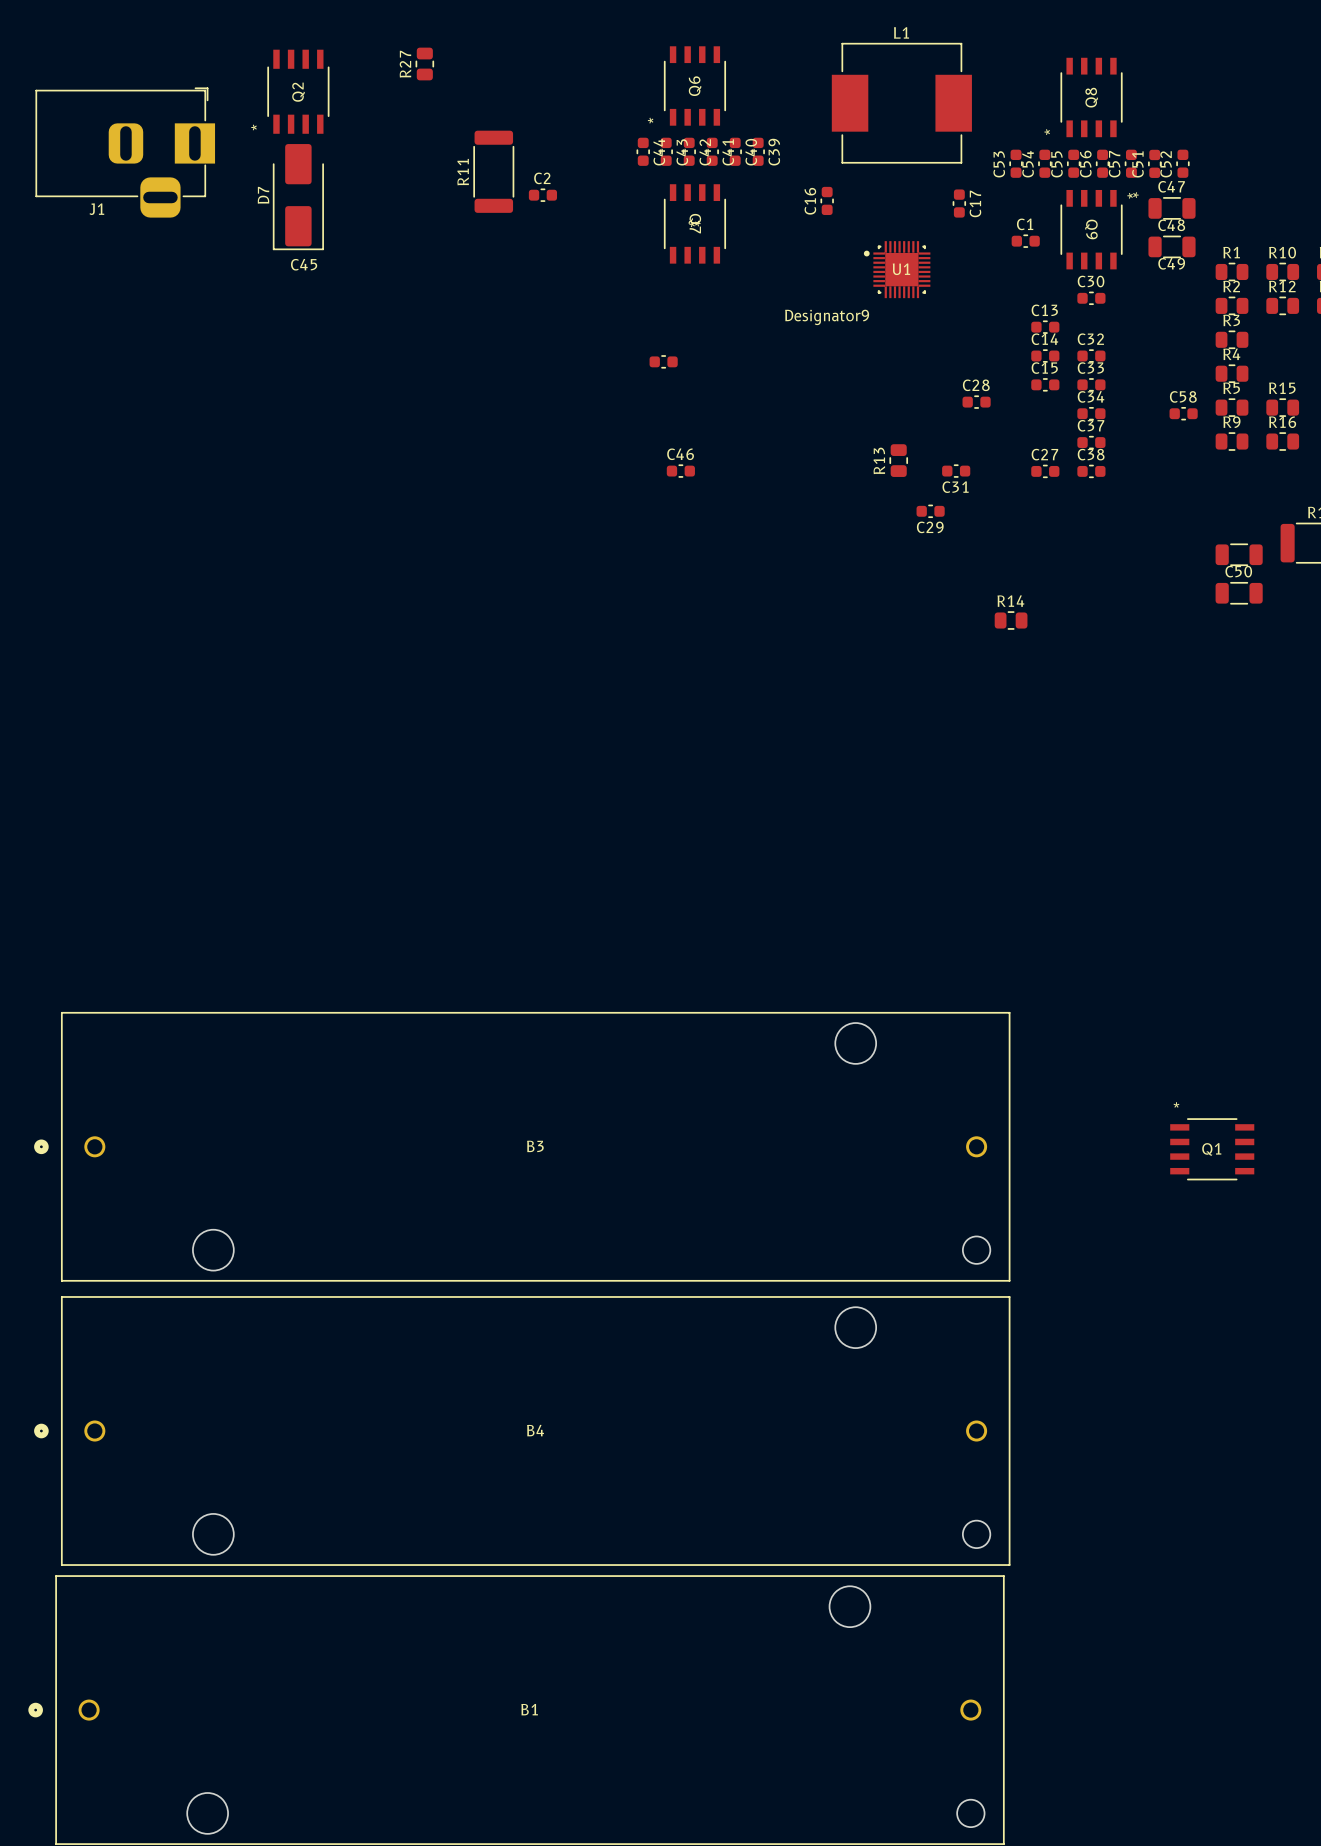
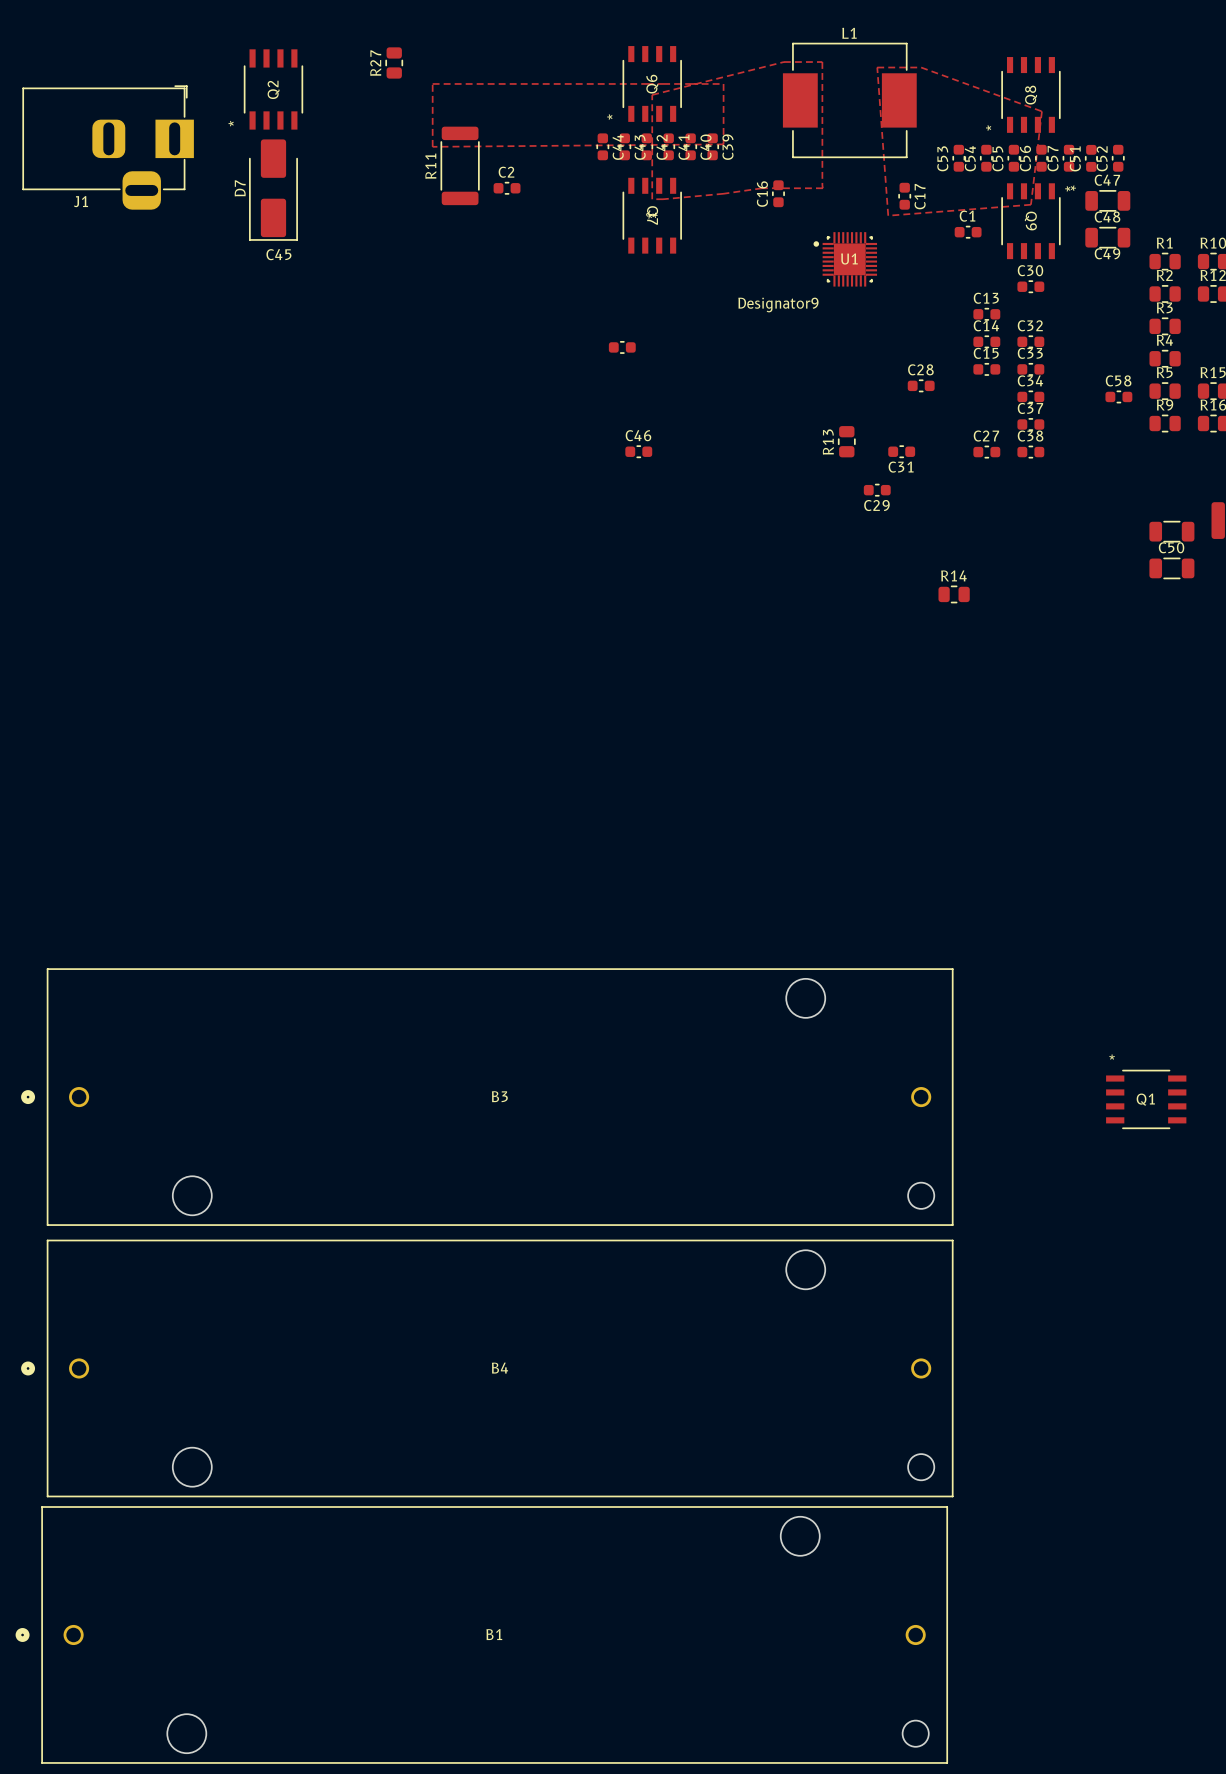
top zone outline: none -> (783, 62) (652, 94) (652, 199) (723, 193) (762, 188) (822, 188) (822, 62) (783, 62)
top zone outline: none -> (877, 67) (921, 67) (1041, 111) (1030, 204) (888, 215) (877, 67)
top zone outline: none -> (432, 83) (723, 83) (723, 144) (432, 146) (432, 83)

